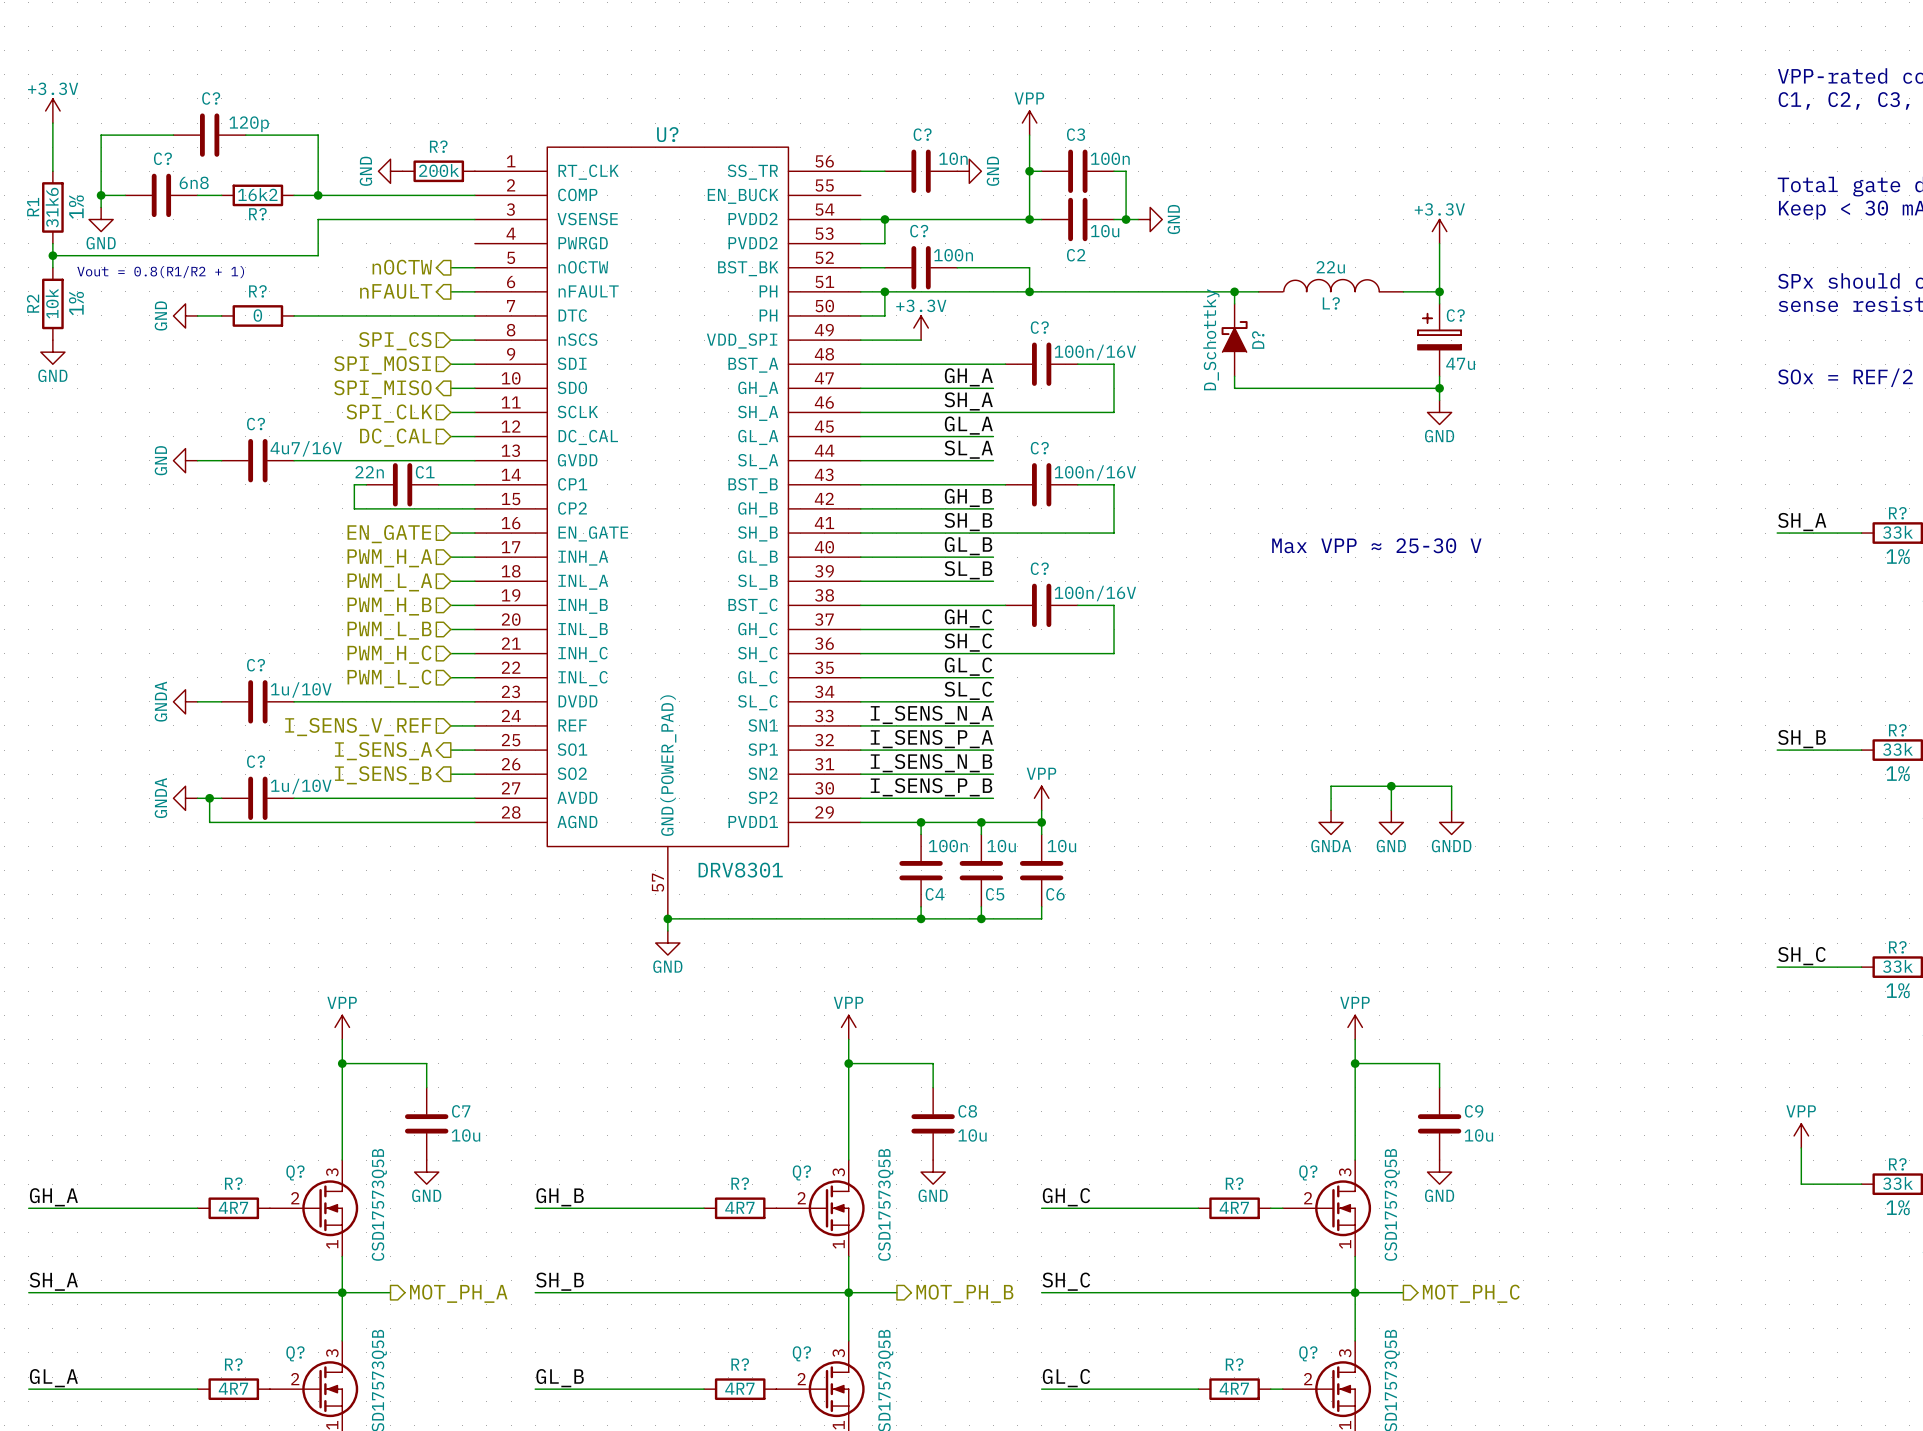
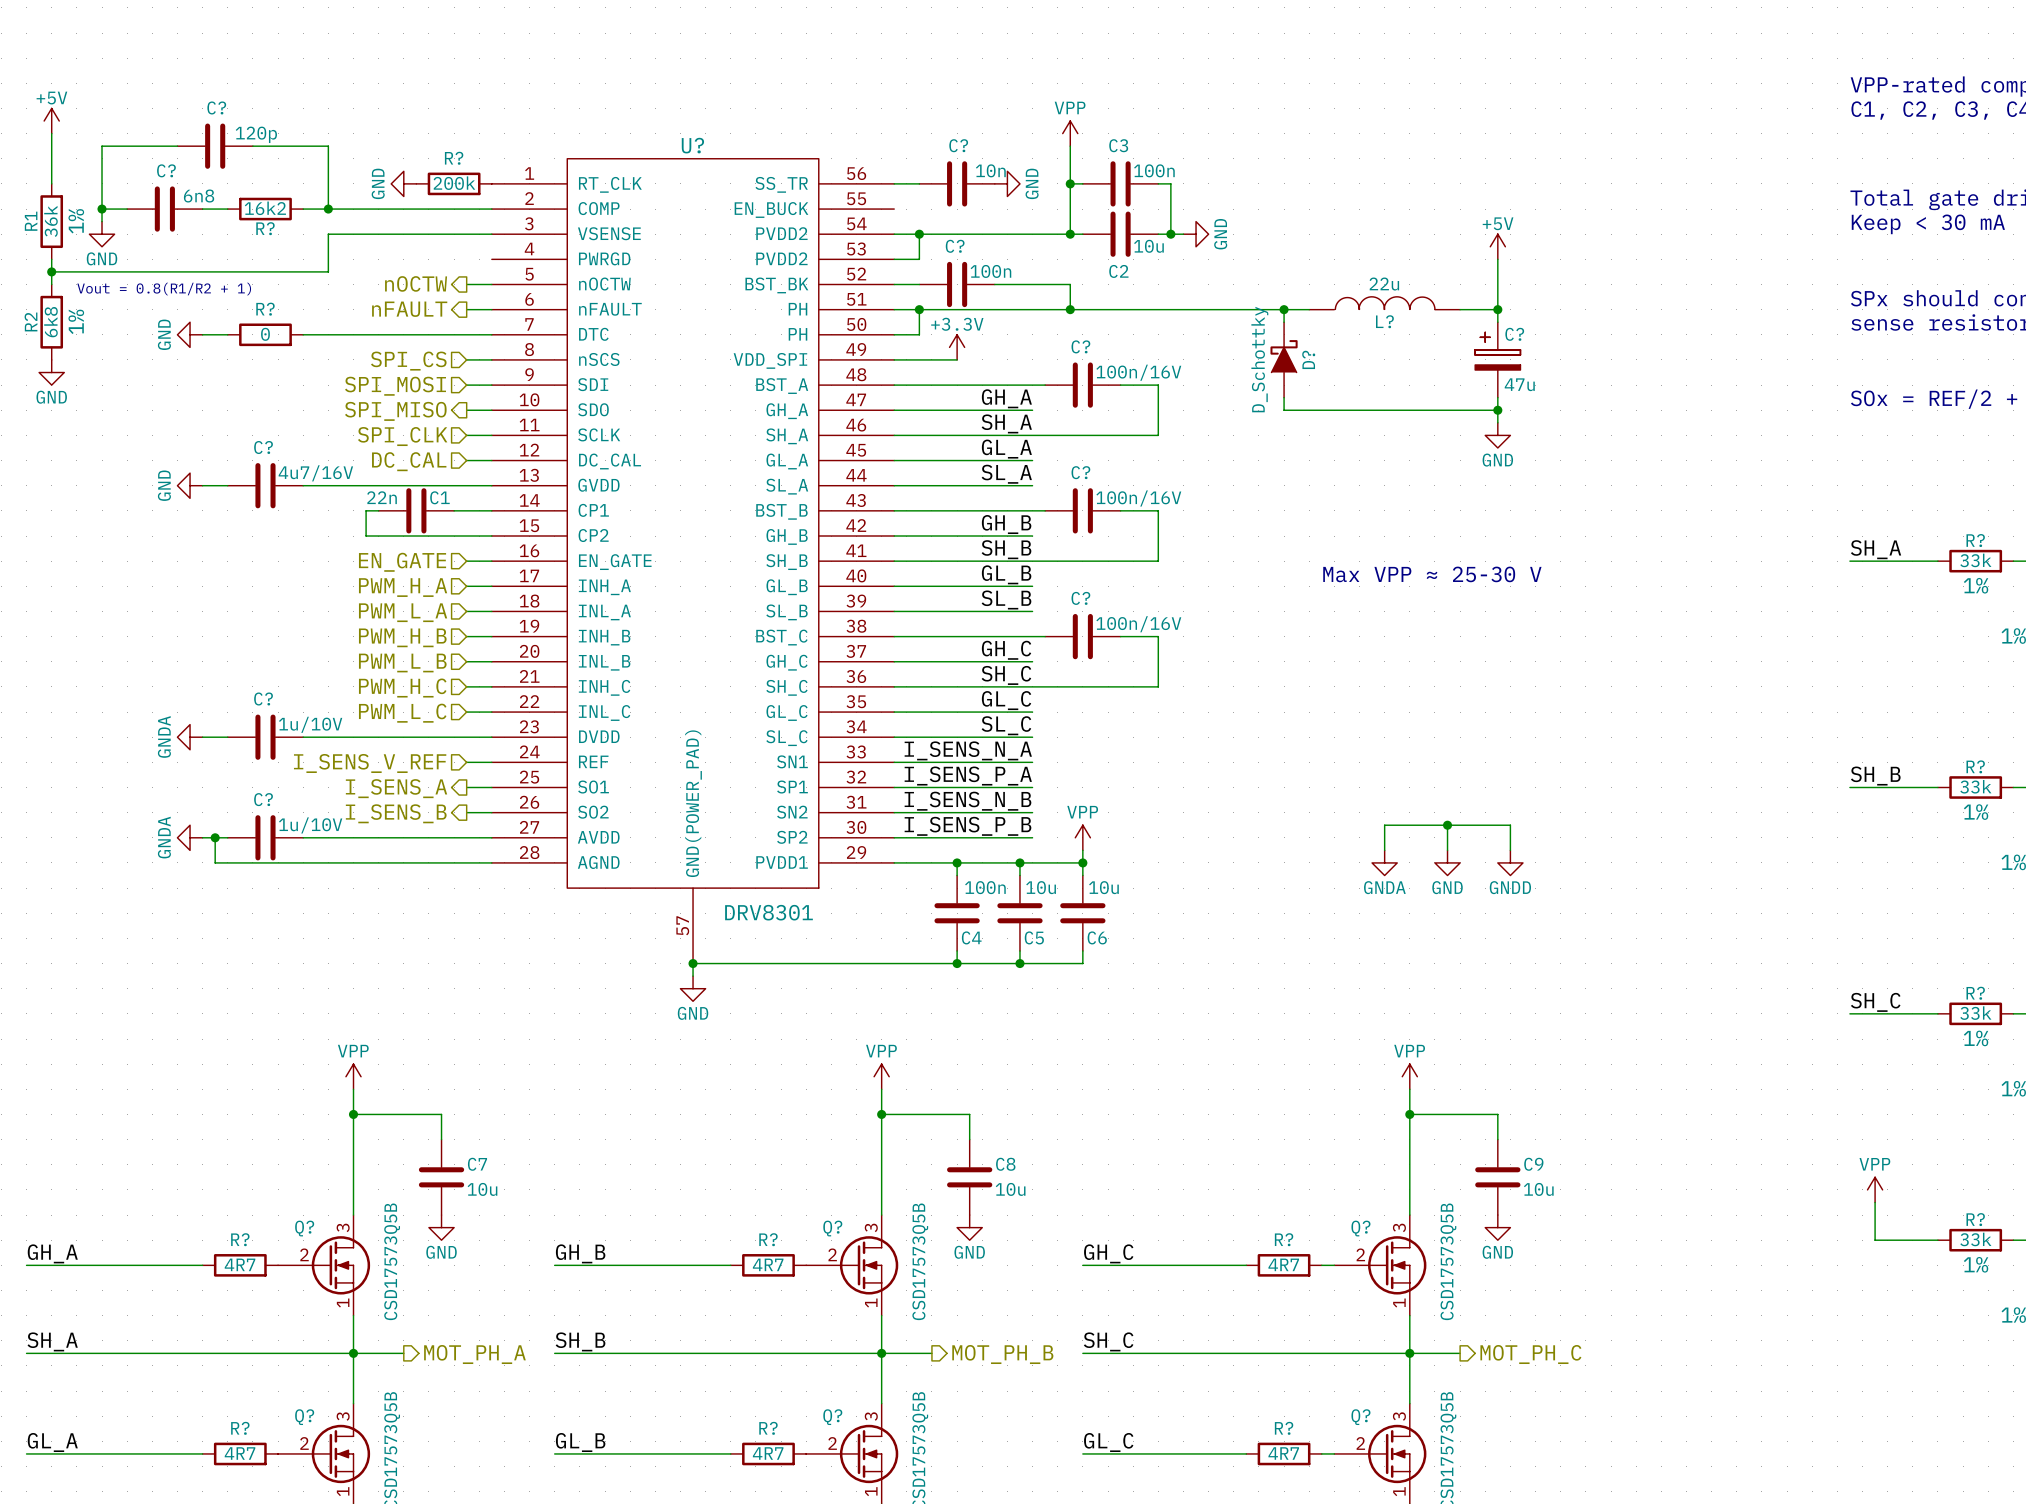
power symbol: +3.3V (52, 110) -> +5V (51, 121)
R1 value: 31k6 (52, 207) -> 36k (50, 221)
power symbol: +3.3V (1439, 231) -> +5V (1497, 246)
R2 value: 10k (52, 303) -> 6k8 (50, 322)

